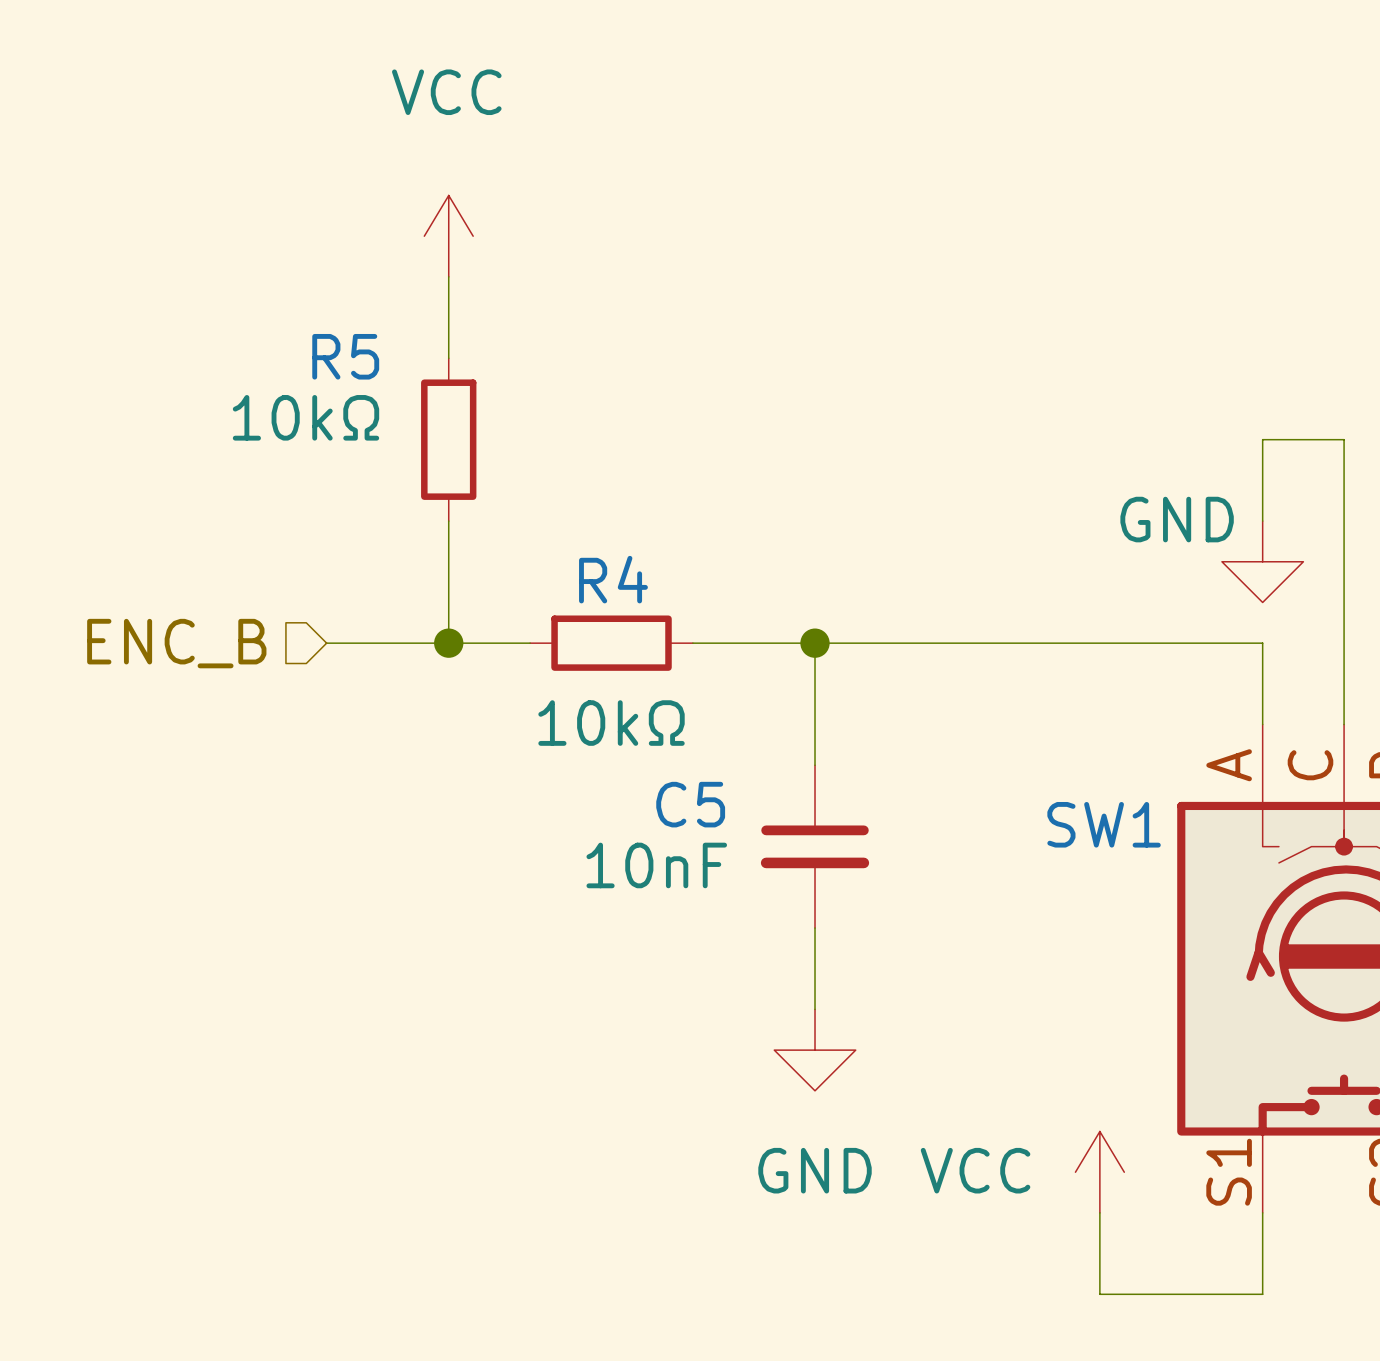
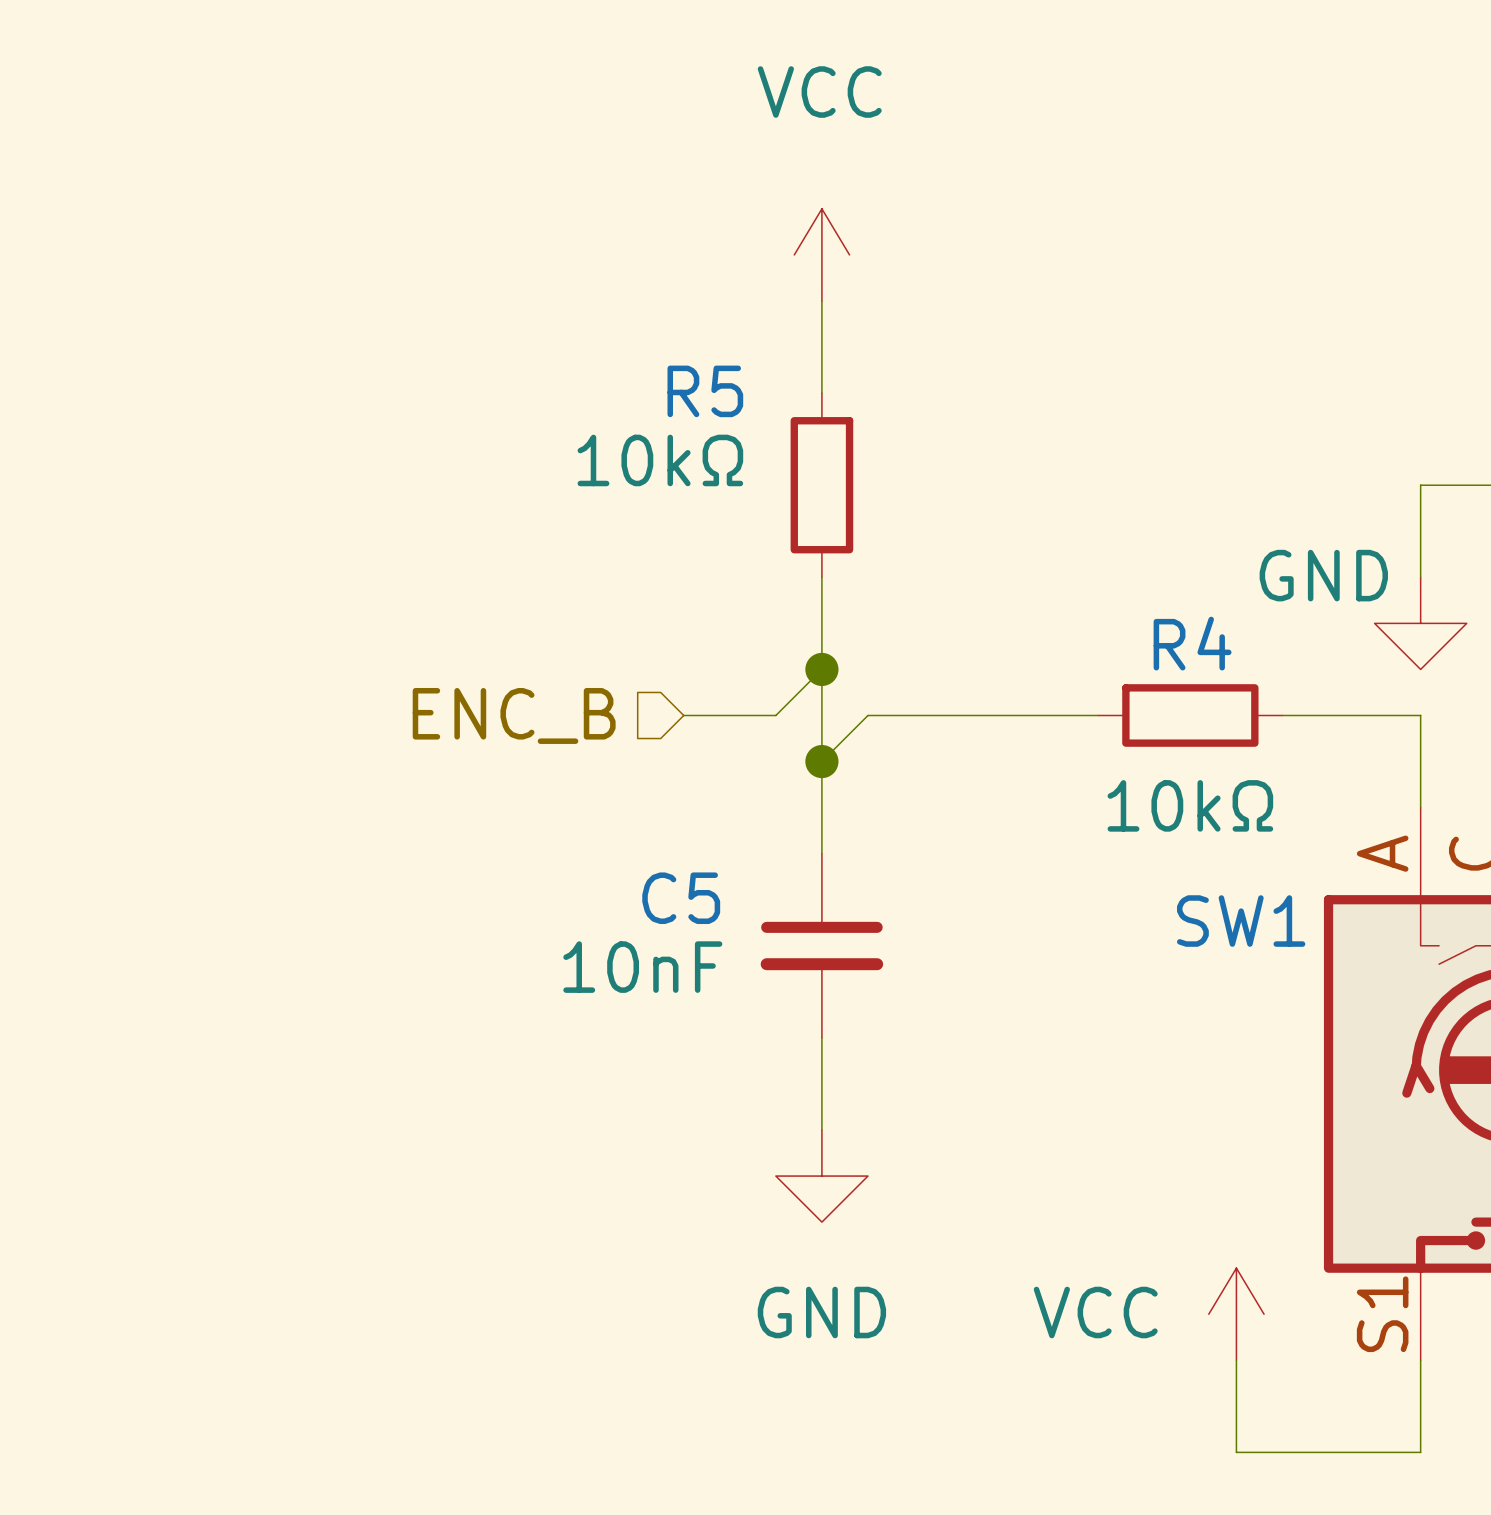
power symbol position: VCC (448, 236) -> VCC (821, 254)
wire: (448, 276) (448, 358) -> (821, 300) (821, 393)
R5 position: (448, 439) -> (821, 485)
wire: (448, 521) (448, 643) -> none
wire: none -> (821, 577) (821, 853)
wire: none -> (821, 669) (775, 715) (683, 715)
junction: none -> (821, 669)
hierarchical label position: ENC_B (176, 643) -> ENC_B (514, 715)
wire: (326, 643) (530, 643) -> none
junction: (448, 643) -> none
R4 position: (611, 643) -> (1190, 715)
wire: (692, 643) (774, 643) -> (821, 761) (867, 715)
wire: (815, 643) (815, 765) -> none
junction: (815, 643) -> none
wire: (977, 643) (1140, 643) -> none
junction: none -> (821, 761)
C5 position: (815, 846) -> (821, 945)
wire: (815, 928) (815, 1009) -> (821, 1037) (821, 1130)
power symbol position: GND (815, 1050) -> GND (821, 1176)

